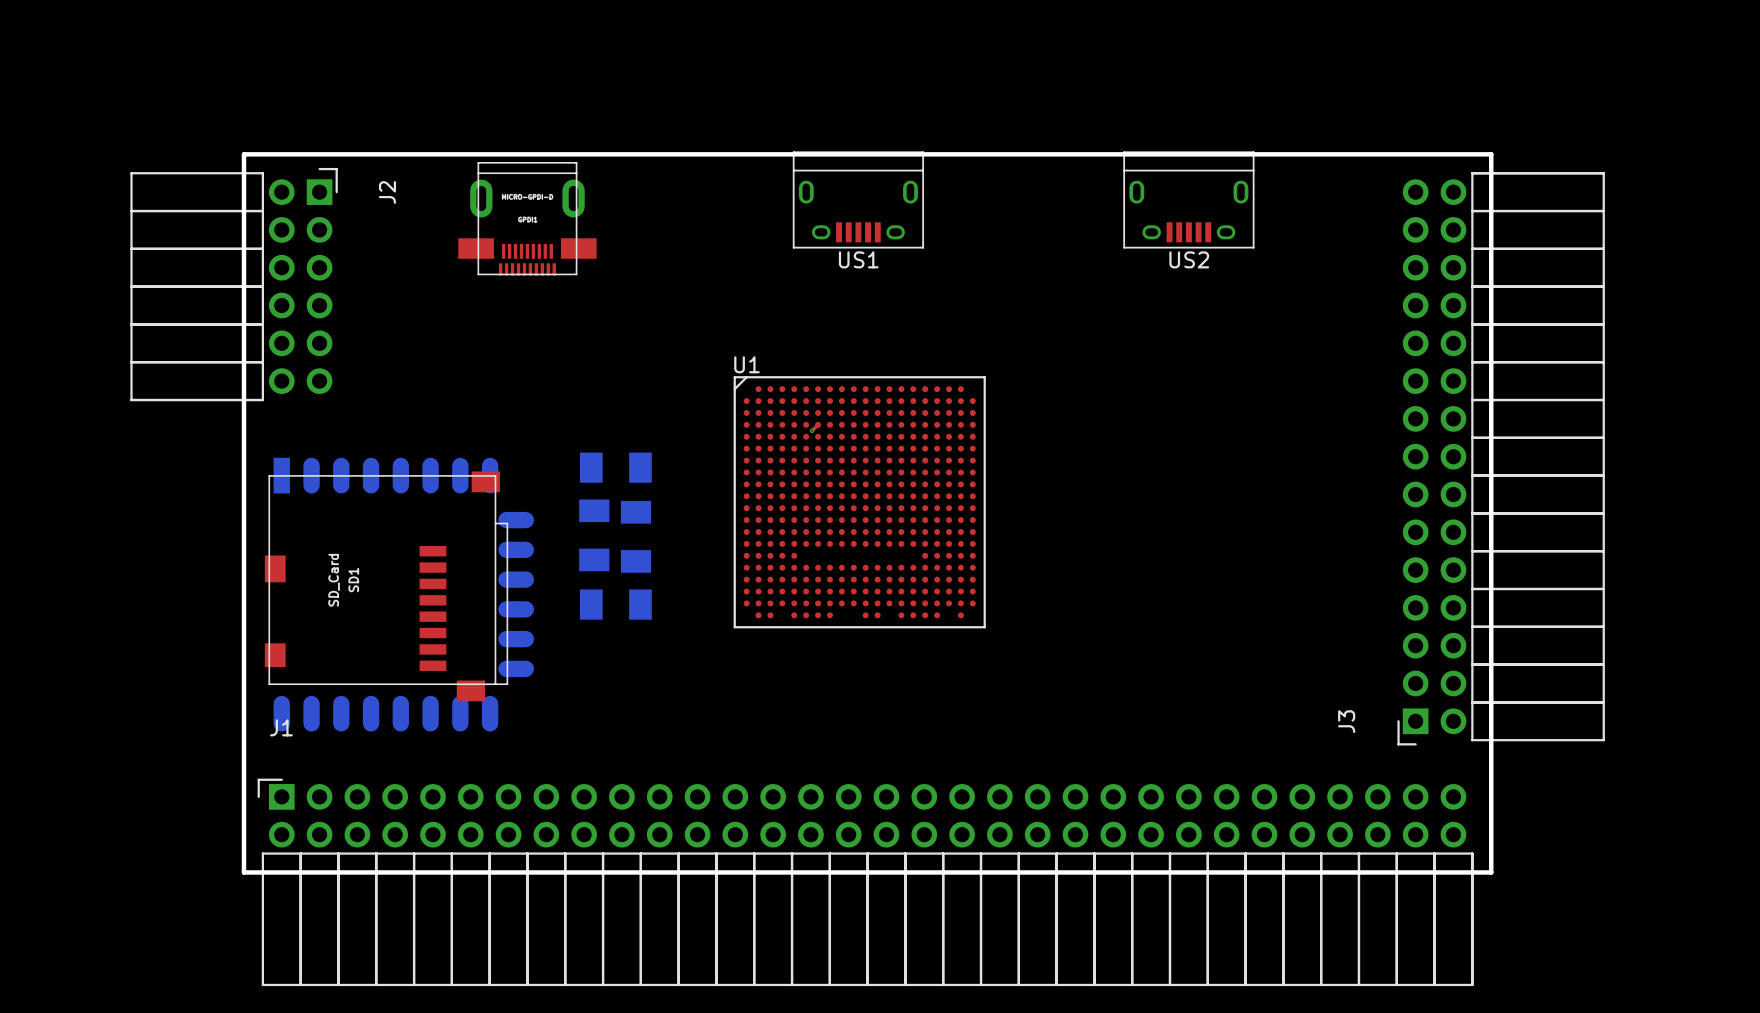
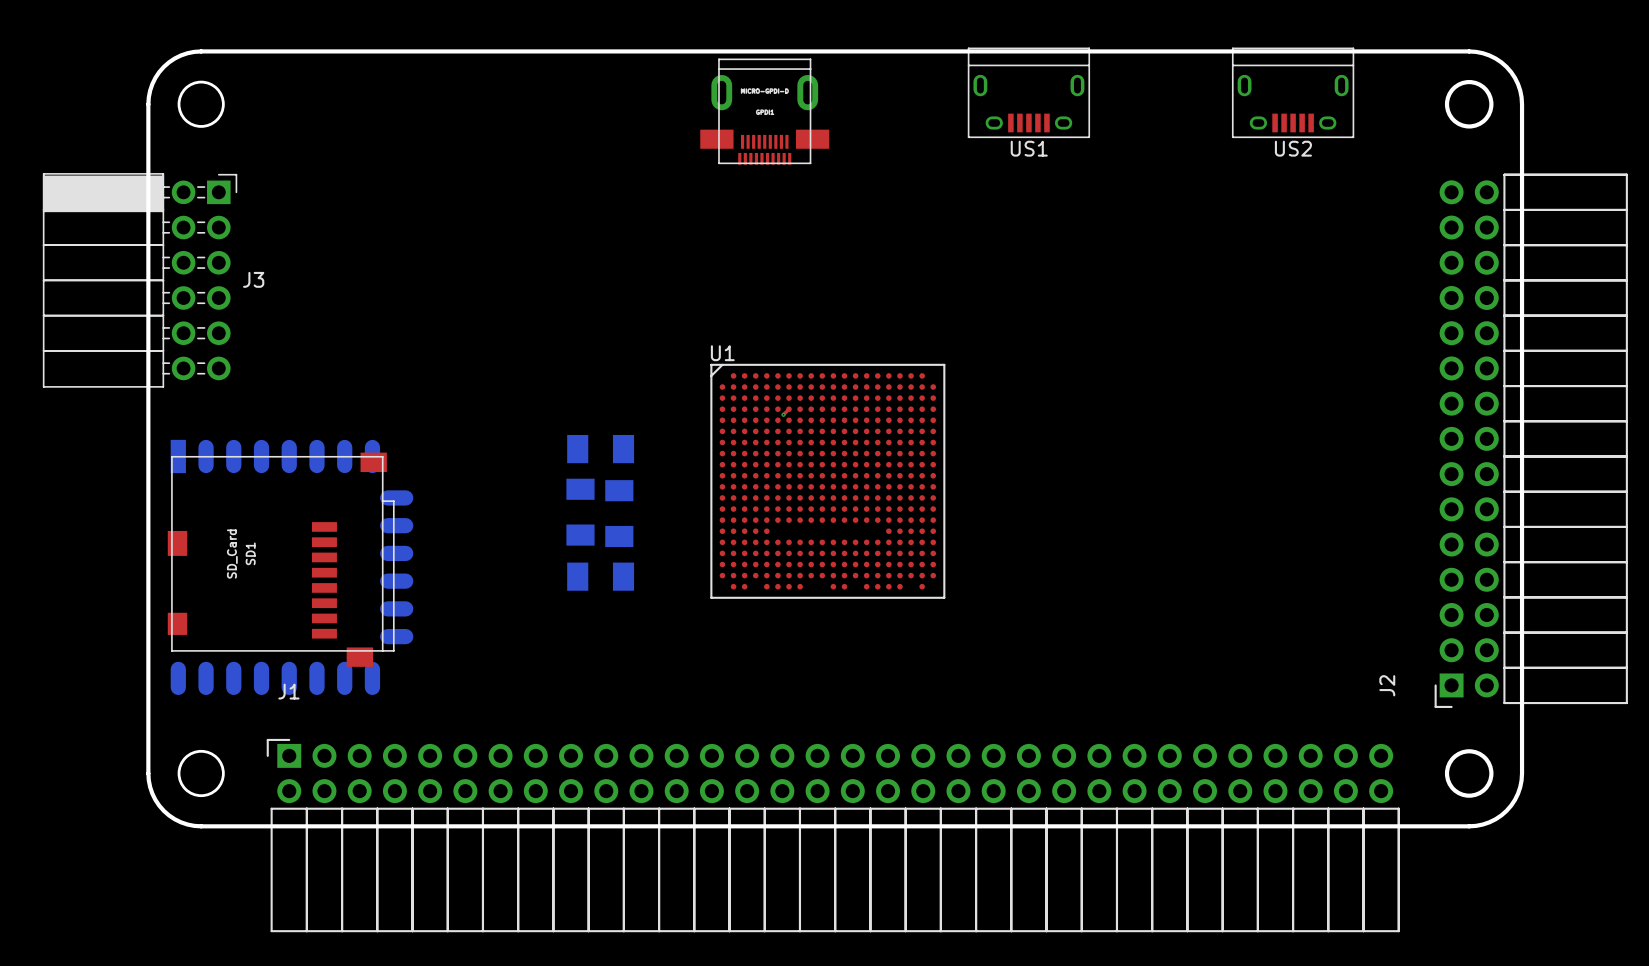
round board edge: none -> [1444, 80, 1494, 129]
round board edge: none -> [177, 80, 225, 128]
J2 footprint: [130, 167, 338, 402] -> [1434, 173, 1628, 708]
J3 footprint: [1397, 172, 1605, 746] -> [42, 173, 238, 388]
J2 name position: J2 (387, 192) -> J2 (1387, 685)
US1 position: (858, 199) -> (1028, 92)
US2 position: (1188, 199) -> (1293, 92)
part position: (527, 219) -> (764, 112)
SD1 position: (386, 586) -> (280, 559)
part position: (403, 594) -> (292, 567)
J3 name position: J3 (1346, 721) -> J3 (253, 279)
round board edge: none -> [1444, 749, 1494, 798]
round board edge: none -> [177, 749, 225, 798]
board edge: (243, 872) (243, 154) (1491, 154) (1491, 872) -> (254, 826) (201, 826) (180, 822) (169, 815) (159, 805) (152, 793) (148, 780) (148, 104) (152, 84) (163, 66) (174, 58) (194, 51) (1469, 51) (1482, 53) (1495, 58) (1506, 66) (1514, 77) (1520, 90) (1522, 104) (1521, 780) (1518, 793) (1511, 805) (1501, 815) (1489, 822) (1469, 826) (1416, 826)

